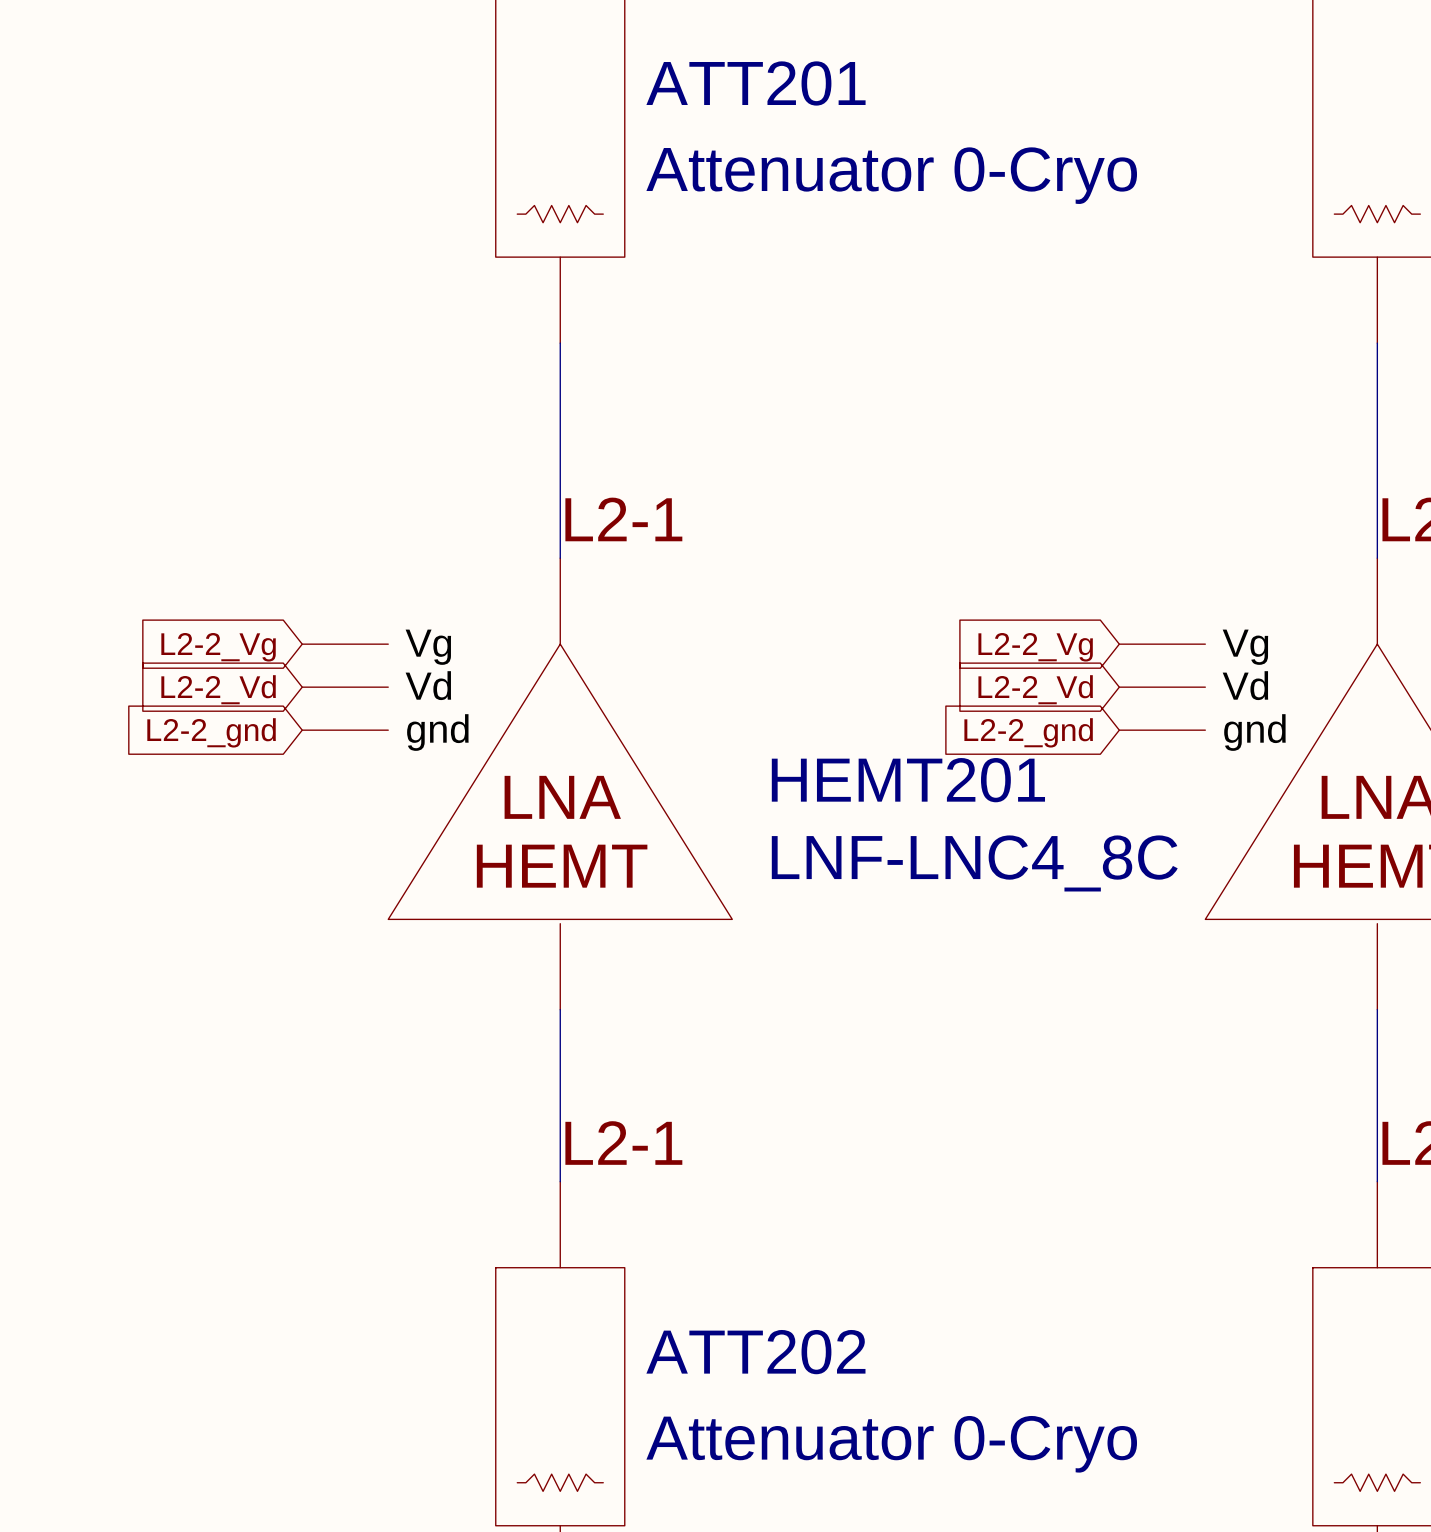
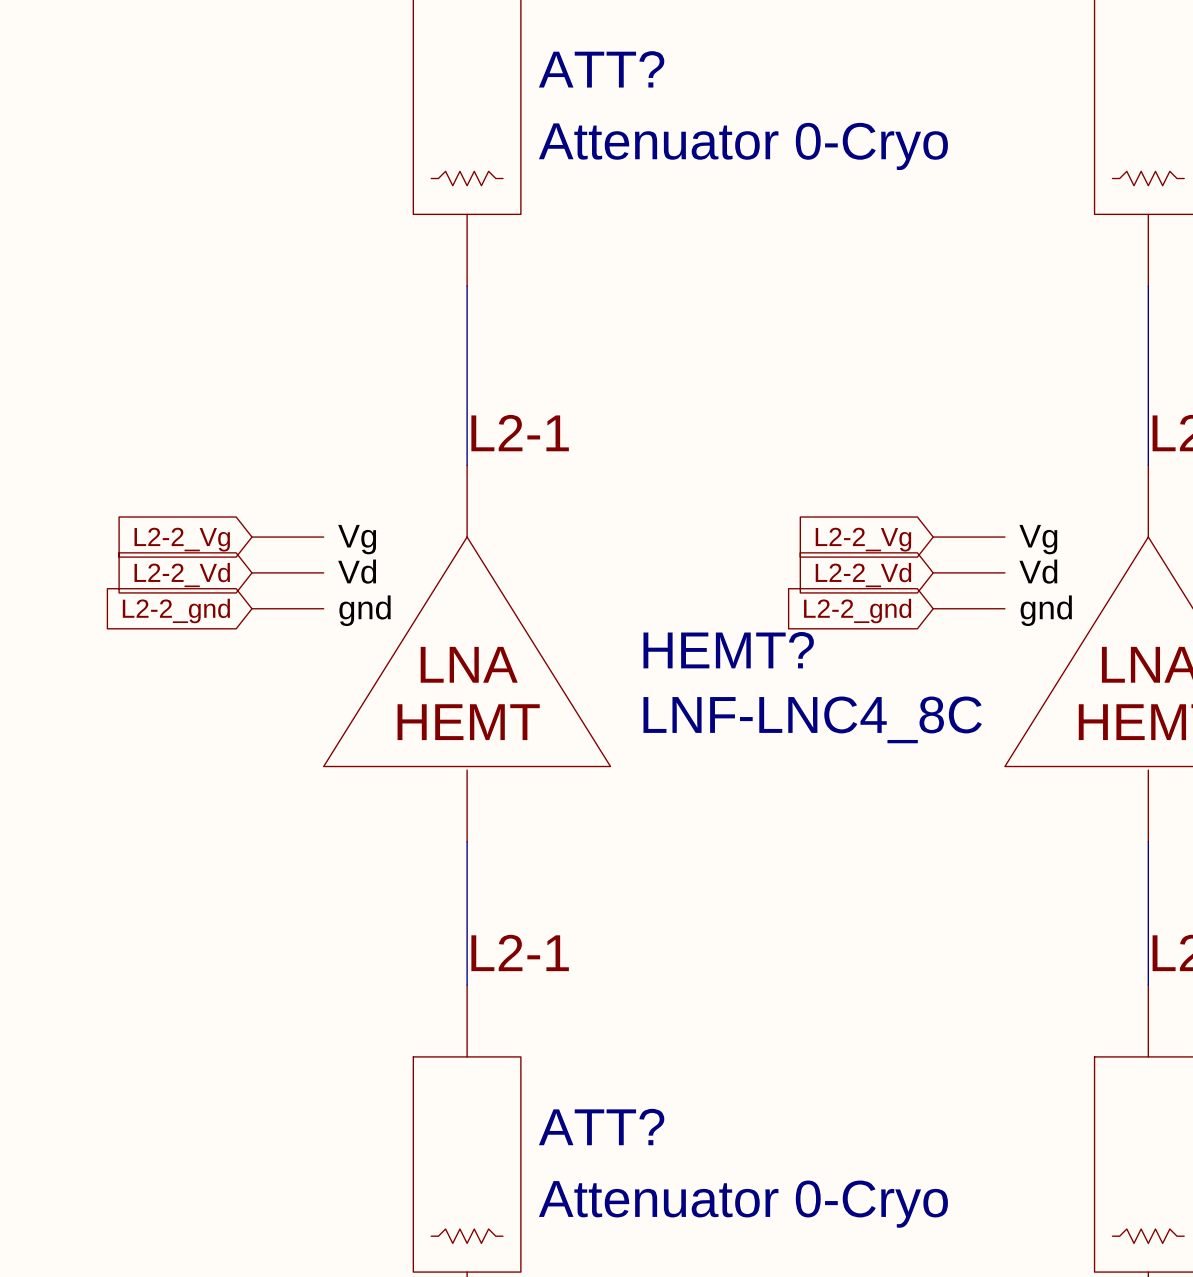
ATT201 name: ATT201 (755, 83) -> ATT? (601, 69)
HEMT201 name: HEMT201 (908, 780) -> HEMT? (728, 650)
ATT202 name: ATT202 (755, 1352) -> ATT? (601, 1127)

